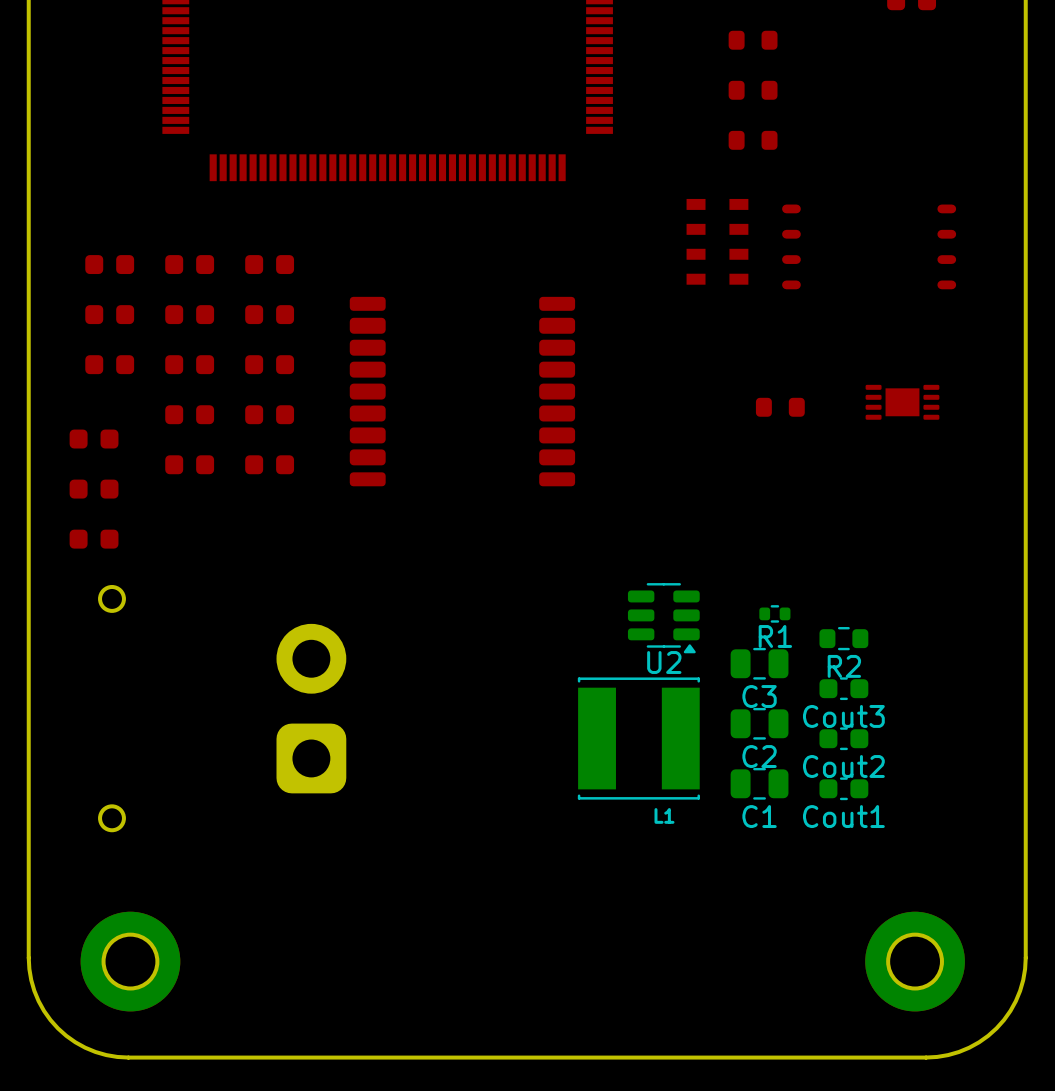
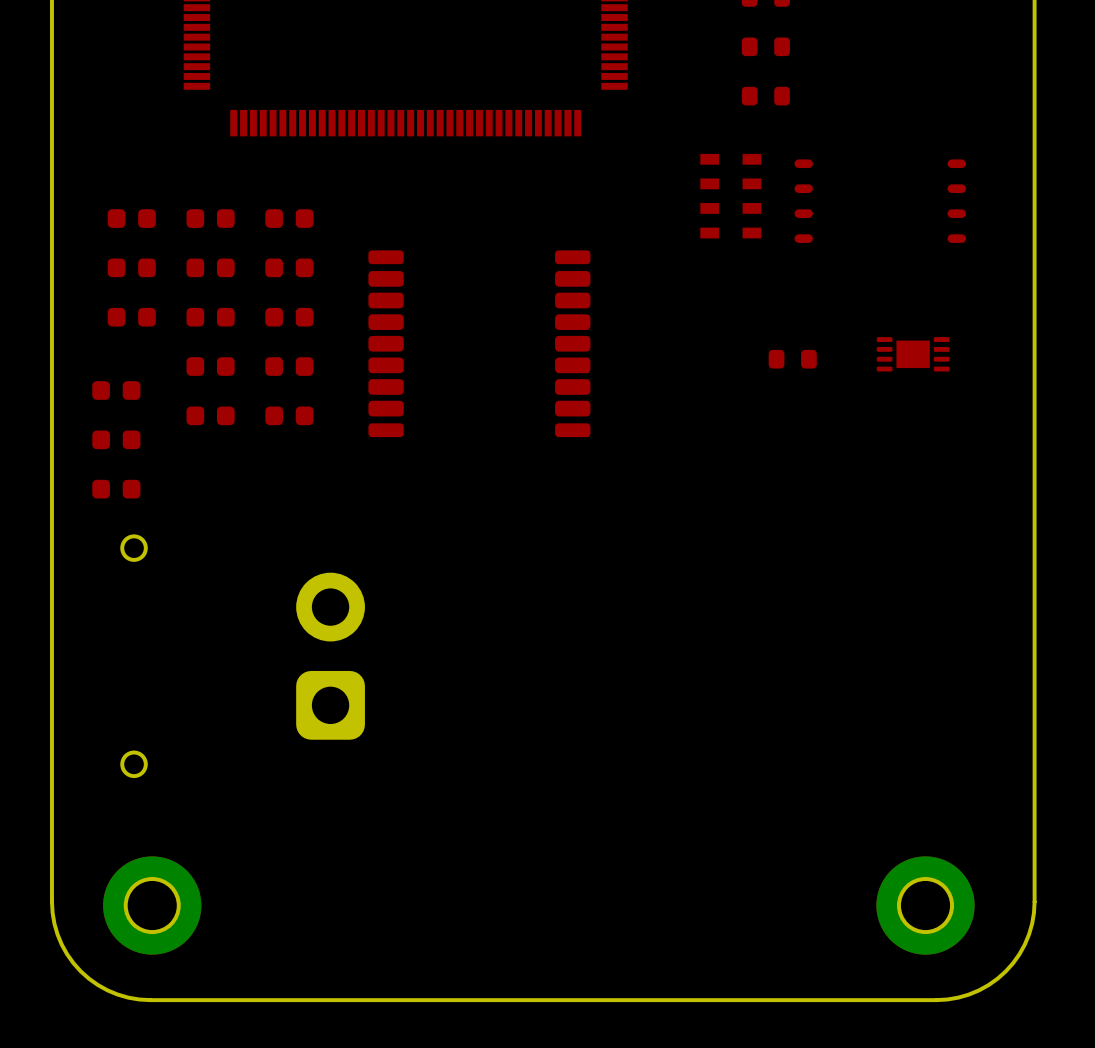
R1: (774, 613) -> none
U2: (663, 618) -> none
R2: (843, 638) -> none
C3: (759, 663) -> none
Cout3: (843, 688) -> none
C2: (759, 723) -> none
L1: (638, 738) -> none
Cout2: (843, 738) -> none
C1: (759, 783) -> none
Cout1: (843, 788) -> none

